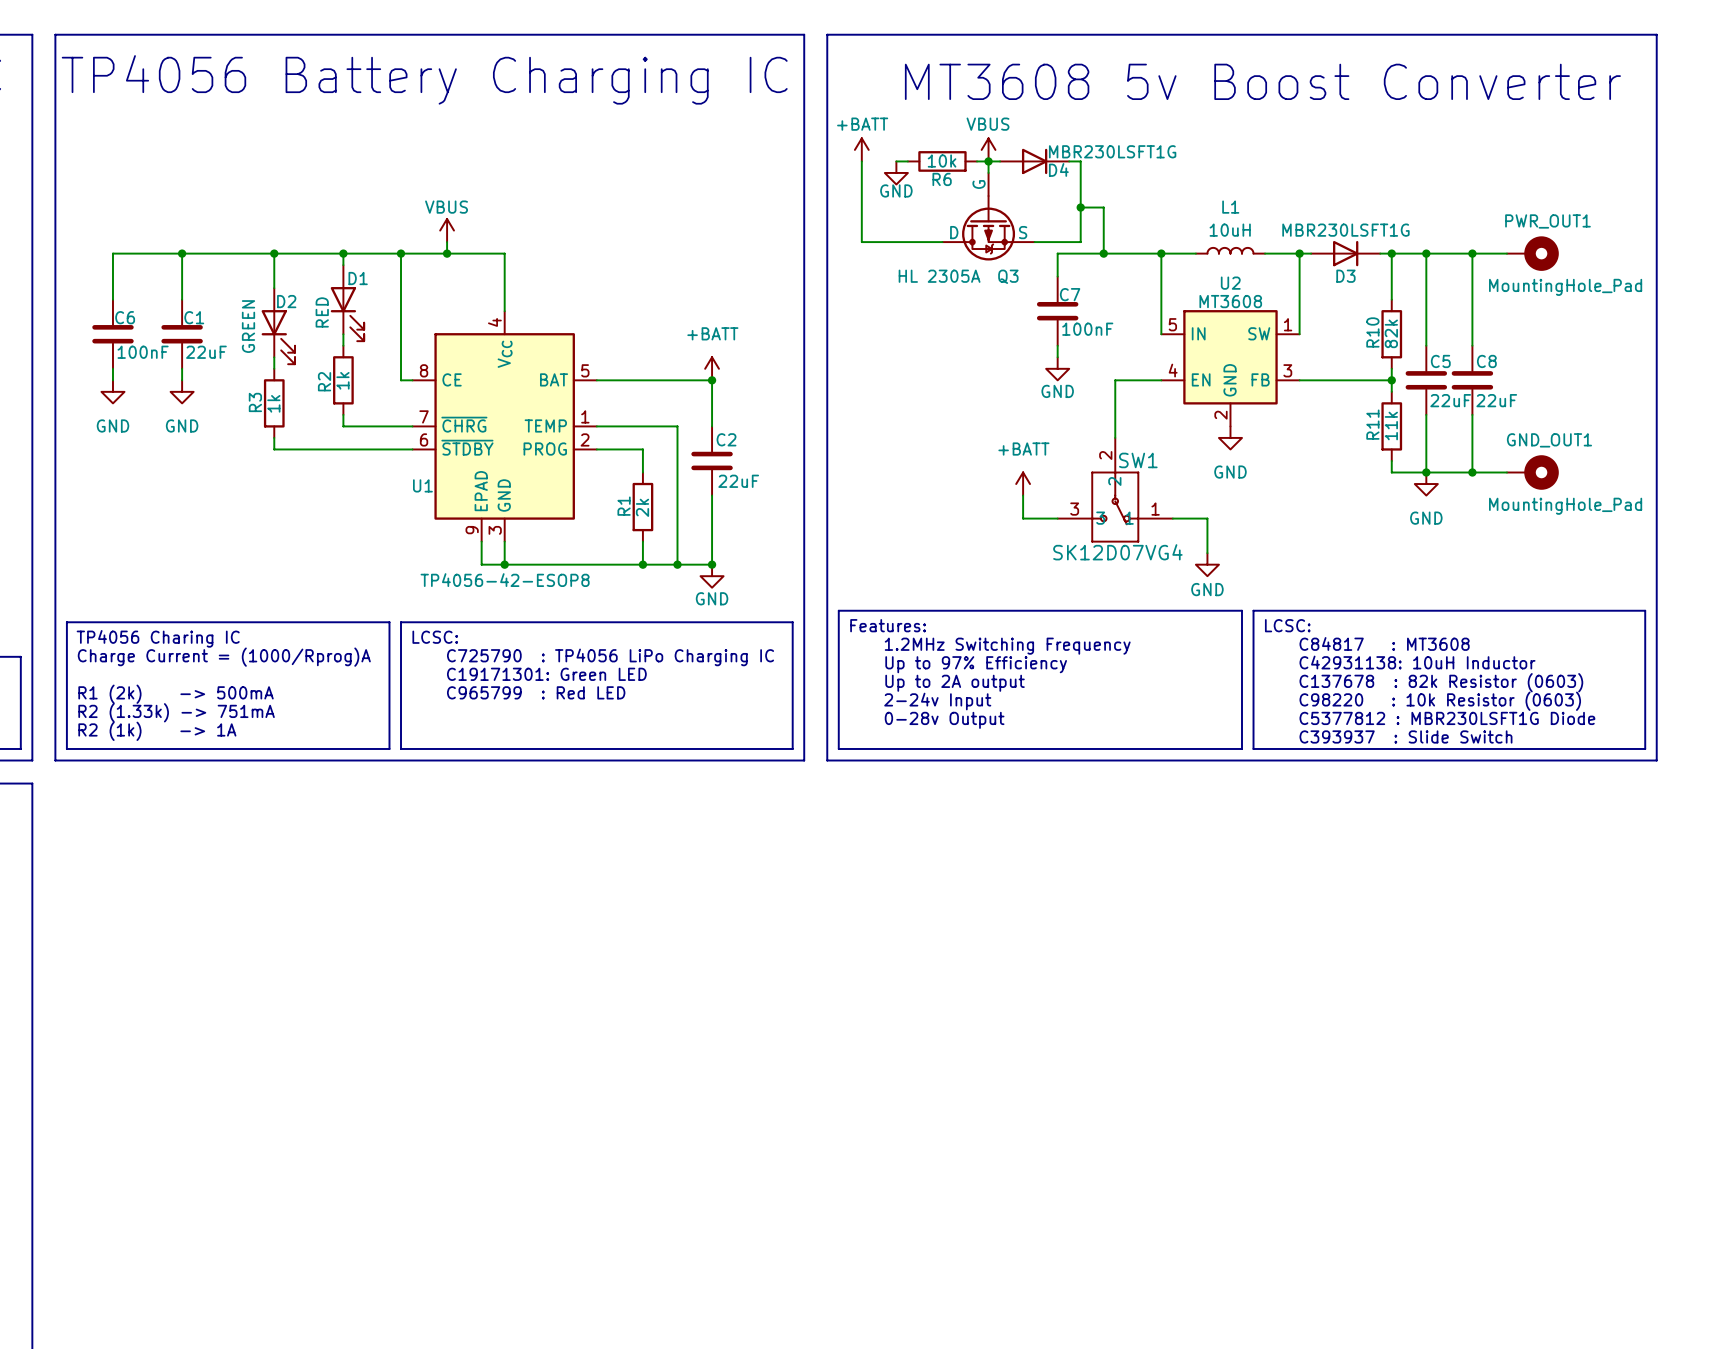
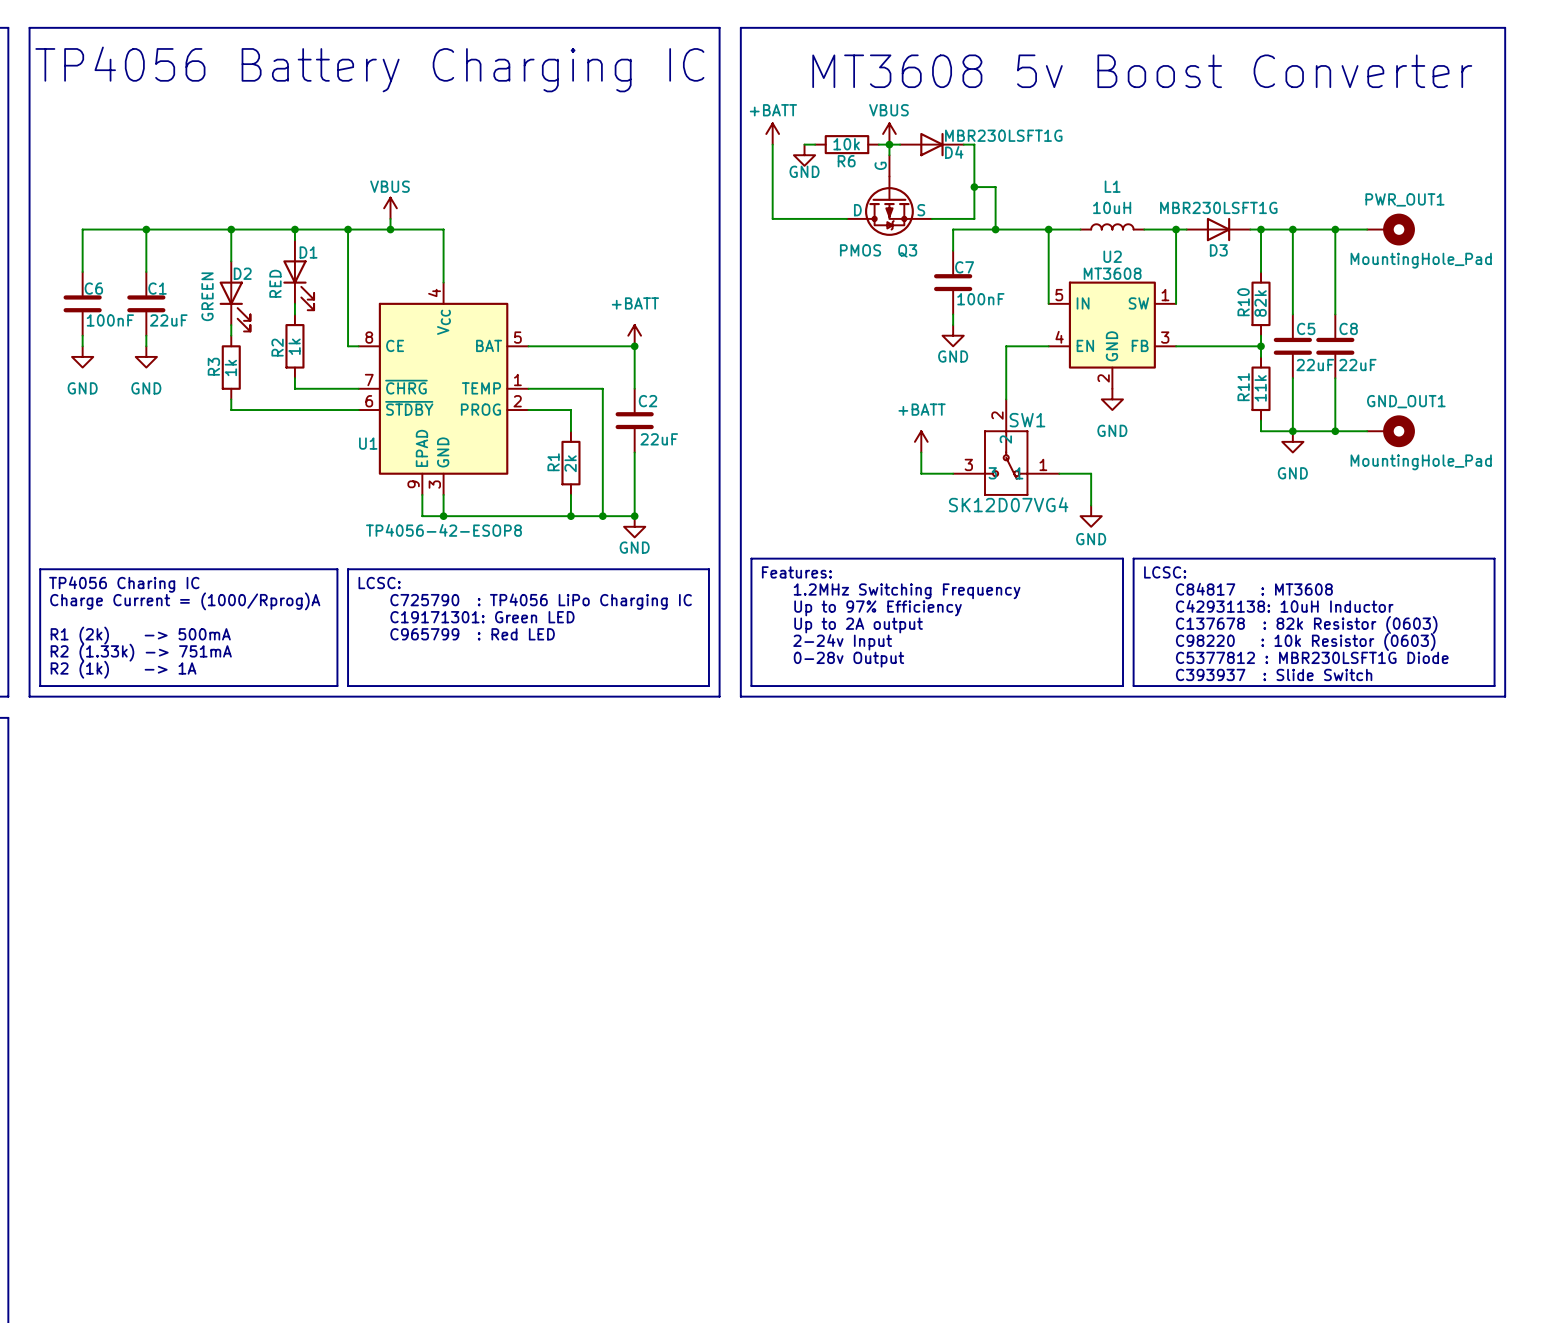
Q3 value: HL 2305A (939, 276) -> PMOS (860, 250)

